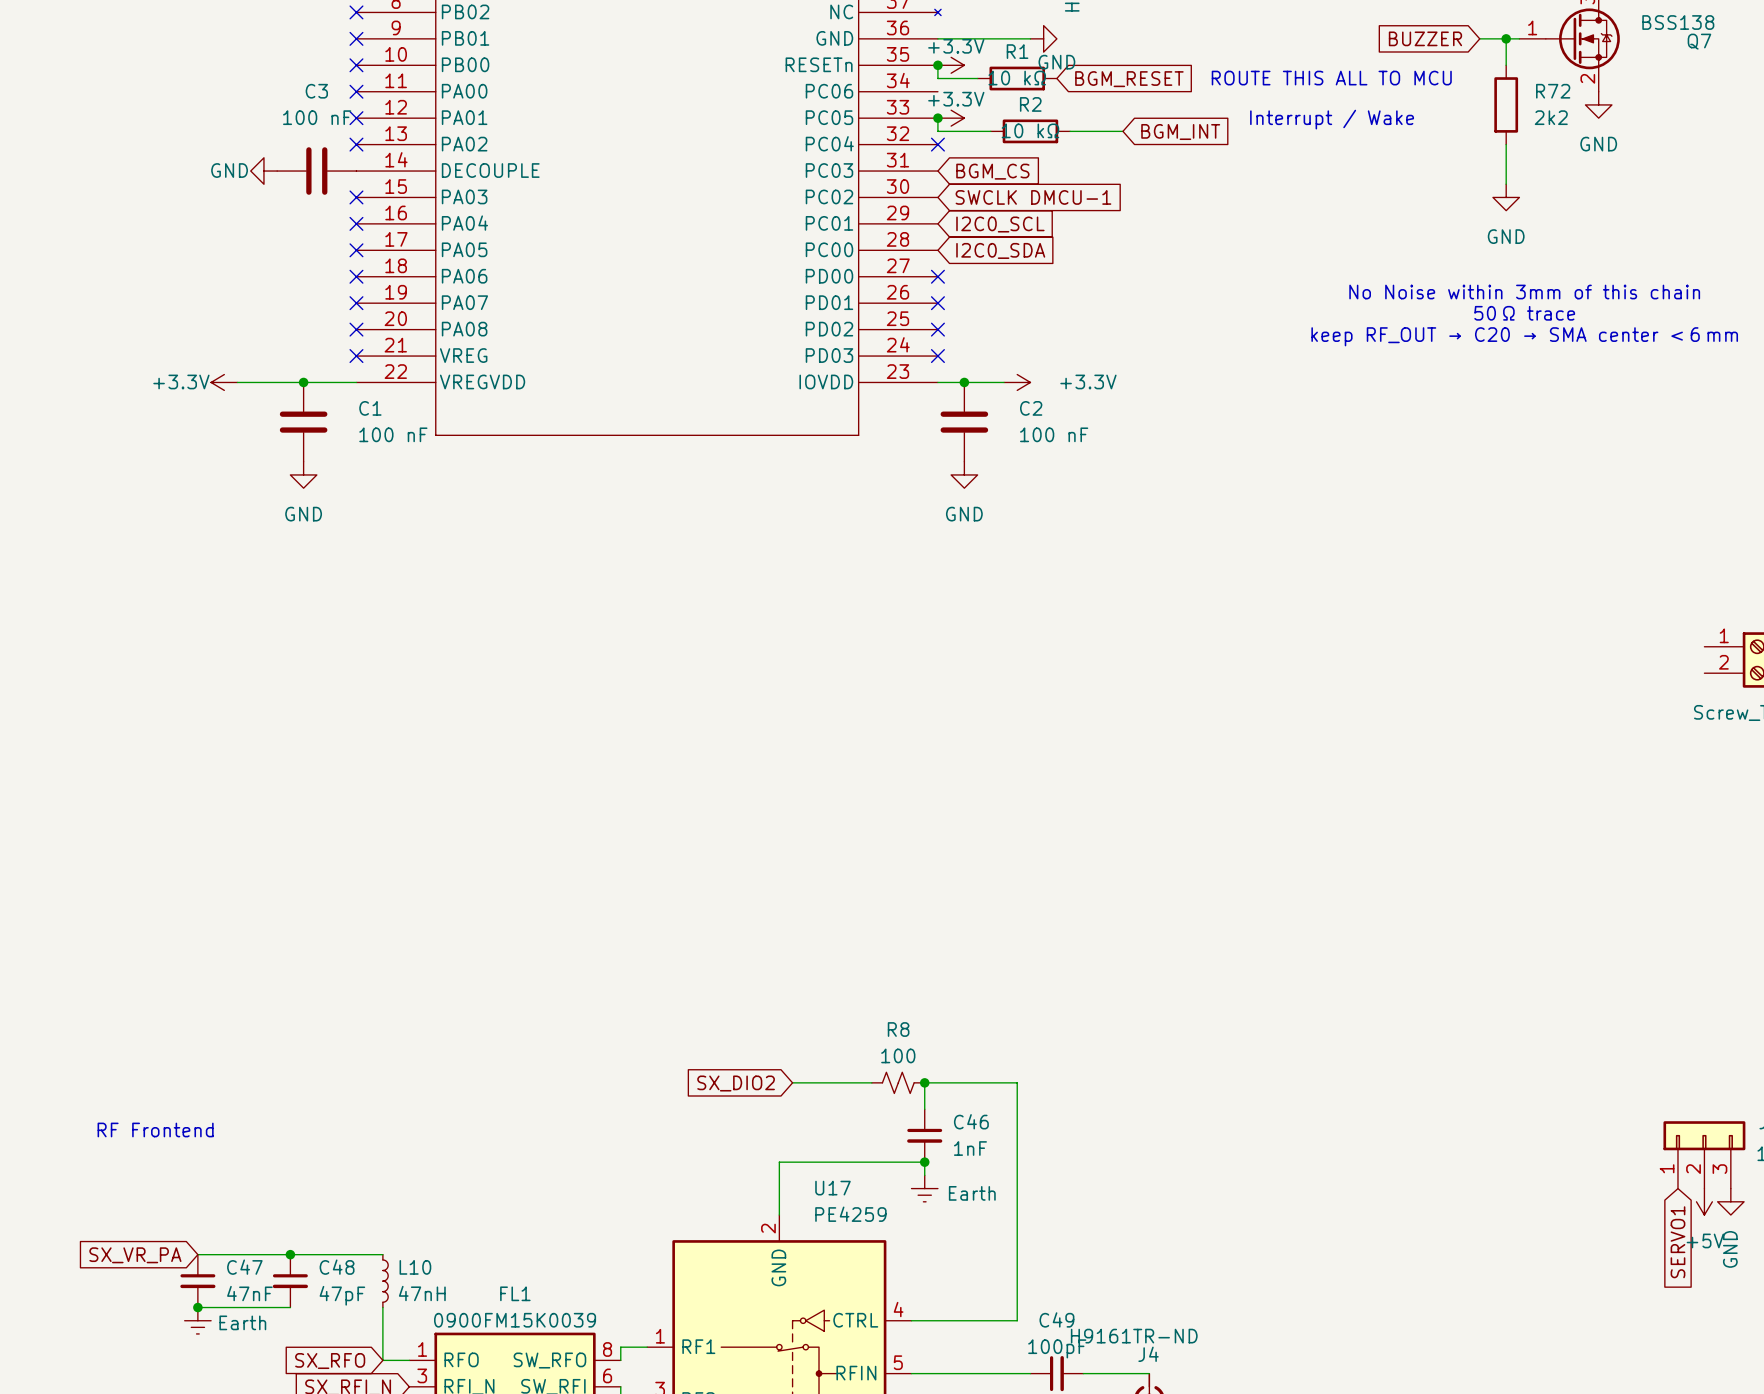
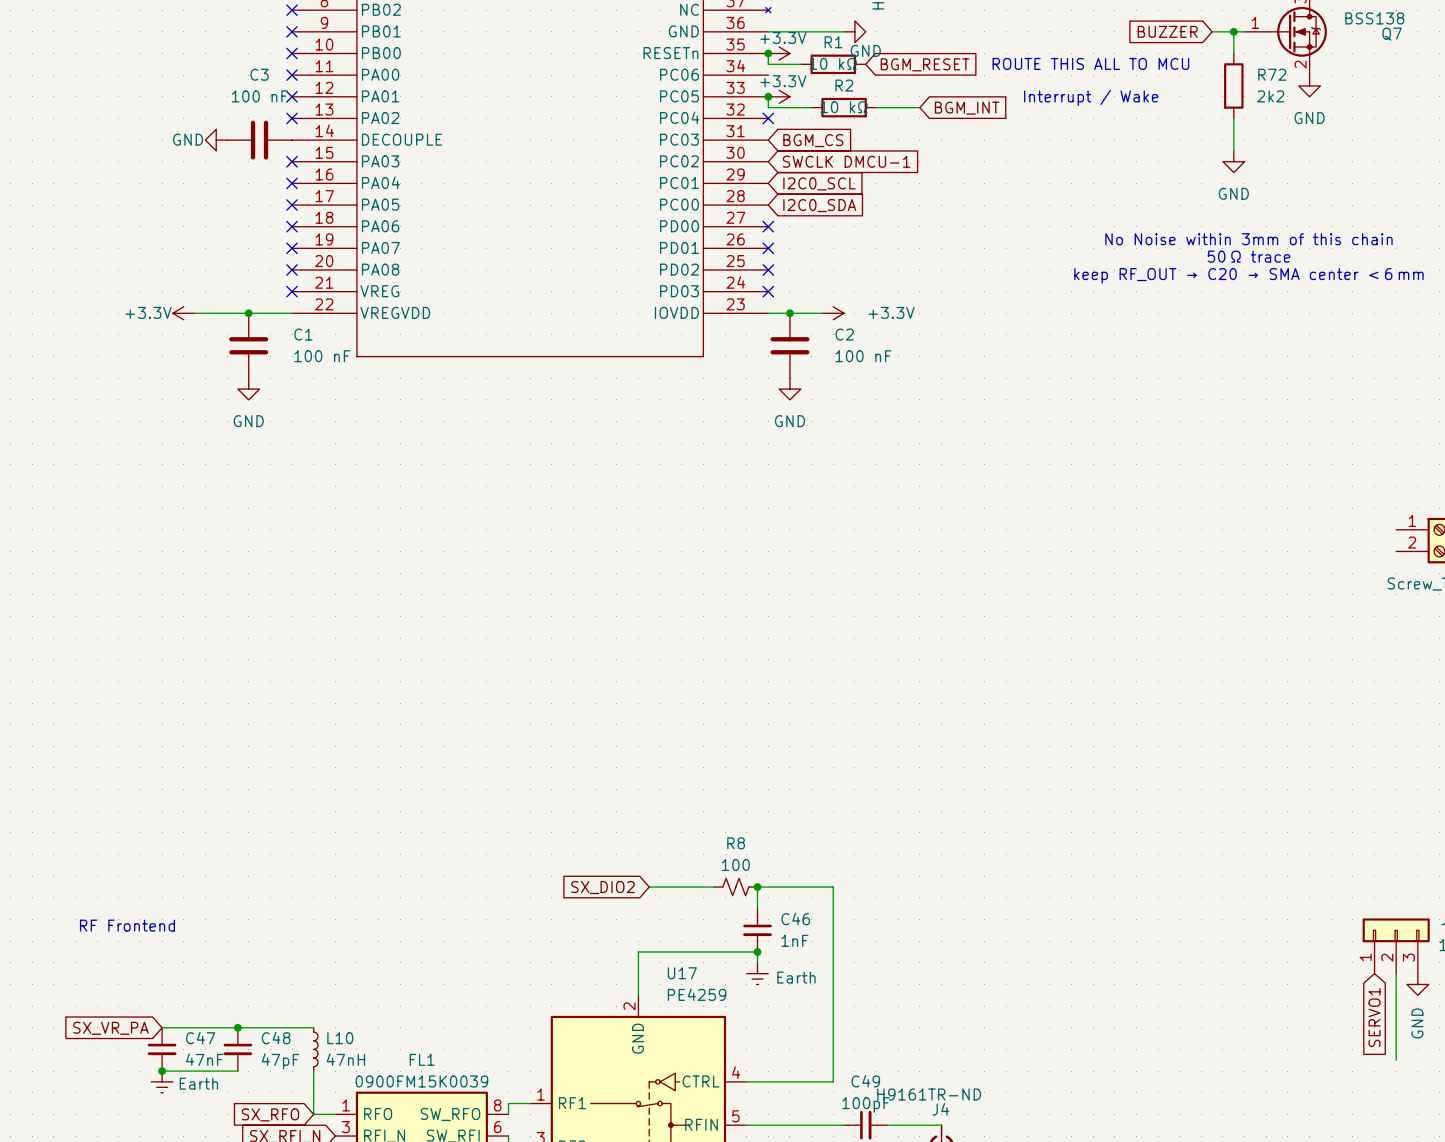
wire: none -> (1396, 973) (1396, 1060)
power symbol: +5V (1704, 1201) -> none

